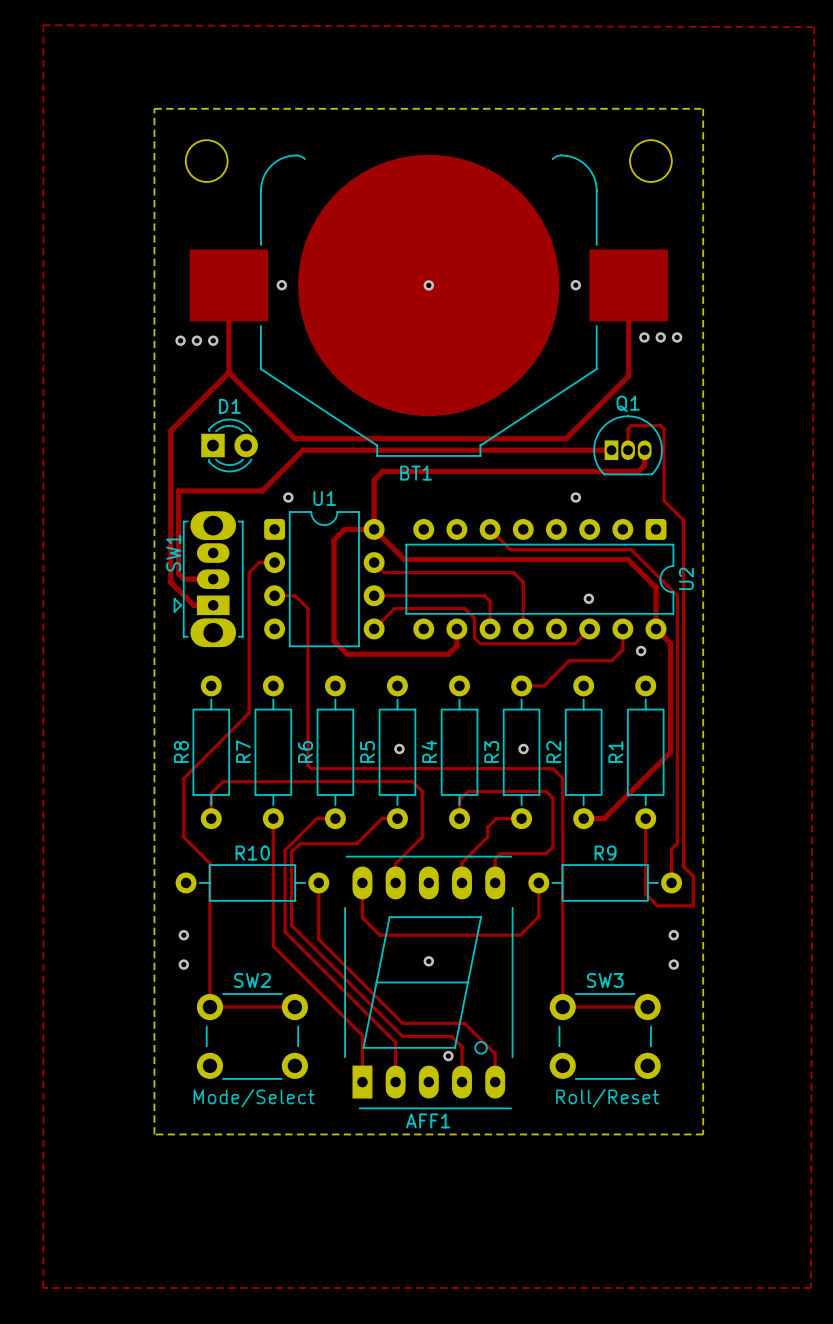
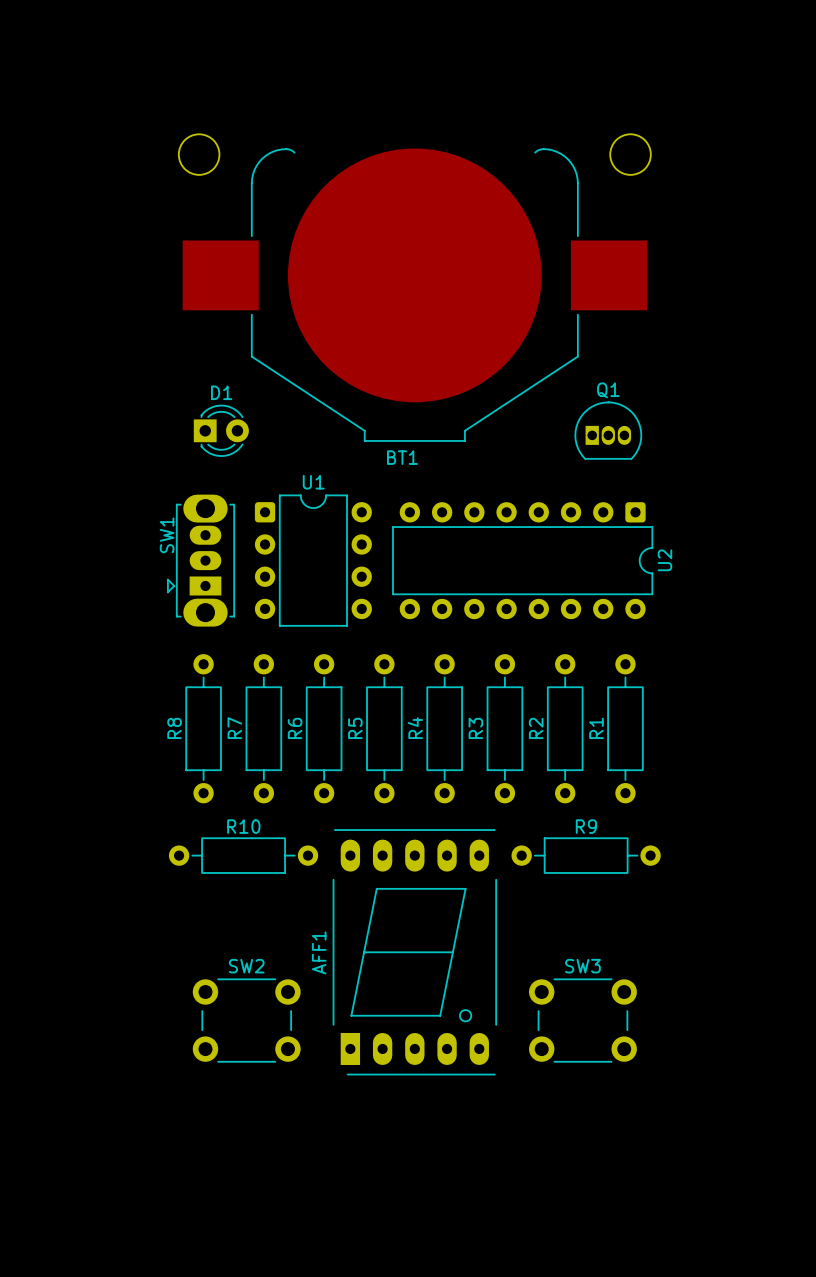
zone outline: (43, 25) (814, 27) (810, 1287) (43, 1287) (43, 25) -> none
board edge: (154, 108) (703, 108) (703, 1134) (154, 1134) (154, 108) -> none
track: (228, 285) (228, 372) -> none
via: (281, 285) -> none
via: (428, 285) -> none
via: (575, 285) -> none
track: (628, 285) (628, 375) (566, 438) (294, 438) (228, 372) -> none
via: (644, 337) -> none
via: (660, 337) -> none
via: (677, 337) -> none
via: (180, 340) -> none
via: (196, 340) -> none
via: (213, 340) -> none
track: (228, 372) (170, 430) (170, 582) (193, 605) (213, 605) -> none
track: (611, 450) (303, 450) (262, 490) (178, 490) (178, 573) (183, 579) (213, 579) -> none
track: (628, 450) (628, 428) (631, 425) (660, 425) (664, 428) (664, 500) (683, 520) (683, 866) (693, 876) (693, 905) (657, 905) (645, 894) (645, 818) -> none
track: (644, 450) (644, 465) (638, 471) (383, 471) (374, 480) (374, 529) -> none
via: (288, 497) -> none
via: (575, 497) -> none
track: (374, 529) (344, 529) (334, 539) (334, 641) (347, 654) (448, 654) (456, 645) (456, 629) -> none
track: (374, 529) (404, 559) (628, 559) (656, 587) (656, 629) (670, 643) (670, 752) (604, 818) (583, 818) -> none
track: (490, 529) (510, 549) (631, 549) (677, 595) (677, 843) (671, 849) (671, 882) -> none
track: (274, 562) (259, 562) (249, 572) (249, 713) (183, 778) (183, 837) (209, 863) (209, 1007) (294, 1007) -> none
track: (374, 562) (384, 572) (513, 572) (523, 582) (523, 629) -> none
track: (274, 595) (295, 595) (307, 608) (307, 765) (311, 768) (552, 768) (562, 778) (562, 1007) (647, 1007) -> none
track: (374, 595) (484, 595) (490, 601) (490, 629) -> none
via: (588, 598) -> none
track: (374, 628) (394, 608) (464, 608) (474, 618) (474, 638) (480, 643) (574, 643) (589, 629) -> none
track: (622, 629) (622, 649) (611, 660) (569, 660) (544, 685) (521, 685) -> none
via: (641, 651) -> none
via: (399, 749) -> none
via: (523, 749) -> none
track: (211, 818) (211, 793) (223, 781) (412, 781) (422, 791) (422, 837) (395, 863) (395, 882) -> none
track: (273, 818) (273, 946) (362, 1035) (362, 1082) -> none
track: (335, 818) (316, 818) (285, 850) (285, 931) (395, 1042) (395, 1082) -> none
track: (397, 818) (382, 818) (356, 843) (299, 843) (291, 852) (291, 925) (402, 1036) (451, 1036) (462, 1046) (462, 1082) -> none
track: (459, 818) (459, 799) (468, 791) (546, 791) (552, 798) (552, 847) (546, 853) (500, 853) (495, 859) (495, 882) -> none
track: (521, 818) (496, 818) (487, 827) (487, 837) (462, 862) (462, 882) -> none
track: (318, 882) (318, 939) (402, 1023) (464, 1023) (495, 1053) (495, 1082) -> none
track: (362, 882) (362, 917) (379, 935) (520, 935) (538, 916) (538, 882) -> none
via: (183, 935) -> none
via: (673, 935) -> none
via: (428, 961) -> none
via: (183, 964) -> none
via: (673, 964) -> none
SW2 position: (252, 1036) -> (246, 1020)
SW3 position: (605, 1036) -> (582, 1020)
via: (448, 1056) -> none
text: Mode/Select (254, 1098) -> none
text: Roll/Reset (607, 1098) -> none
AFF1 name rotation: 0° (428, 1120) -> 90° counterclockwise (319, 952)
AFF1 name position: AFF1 (428, 1120) -> AFF1 (319, 952)

